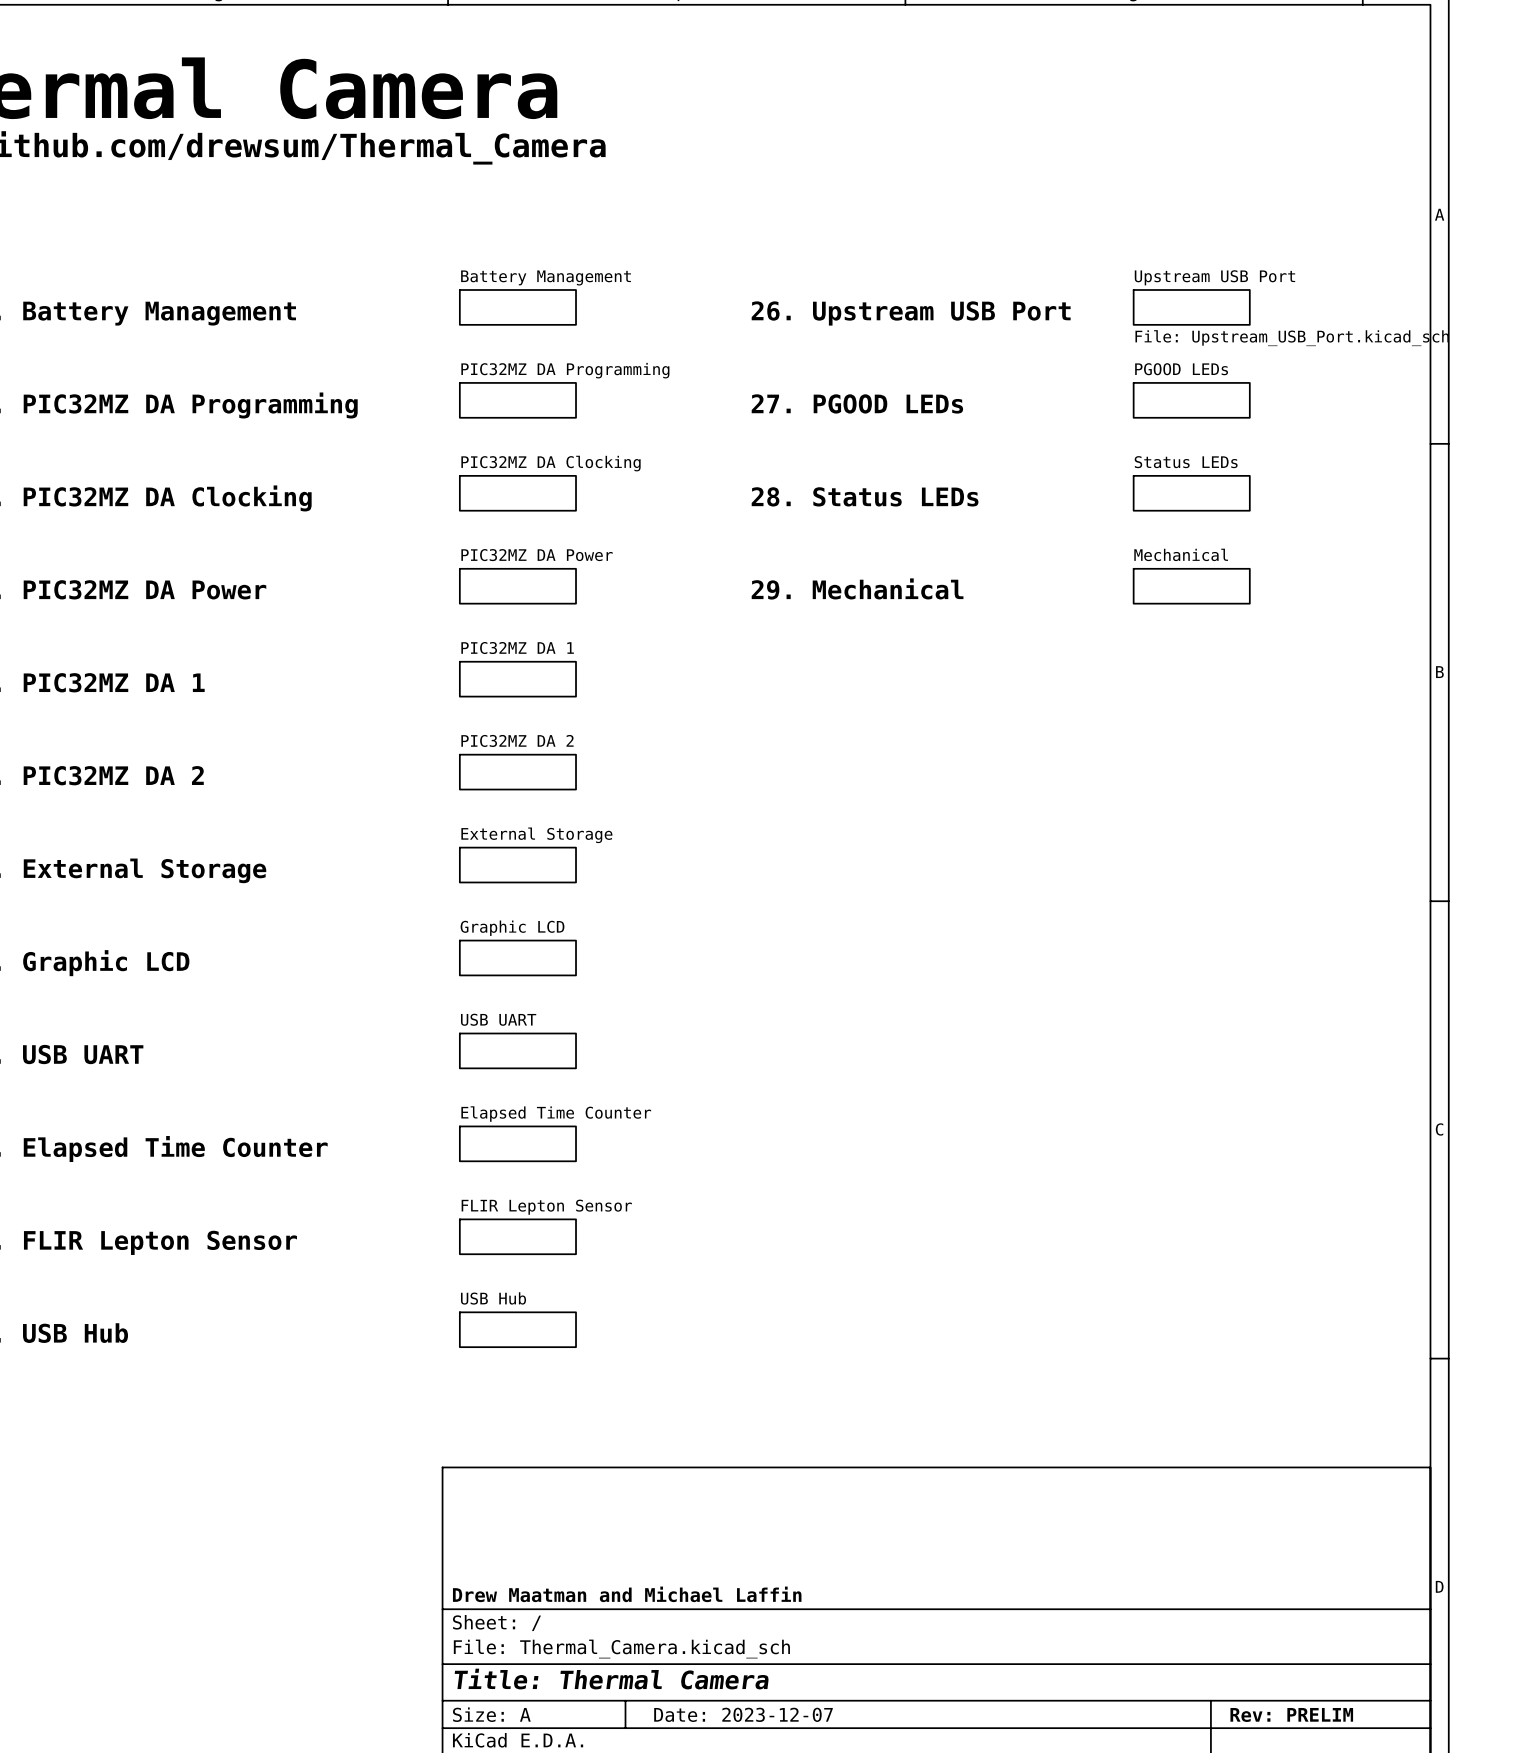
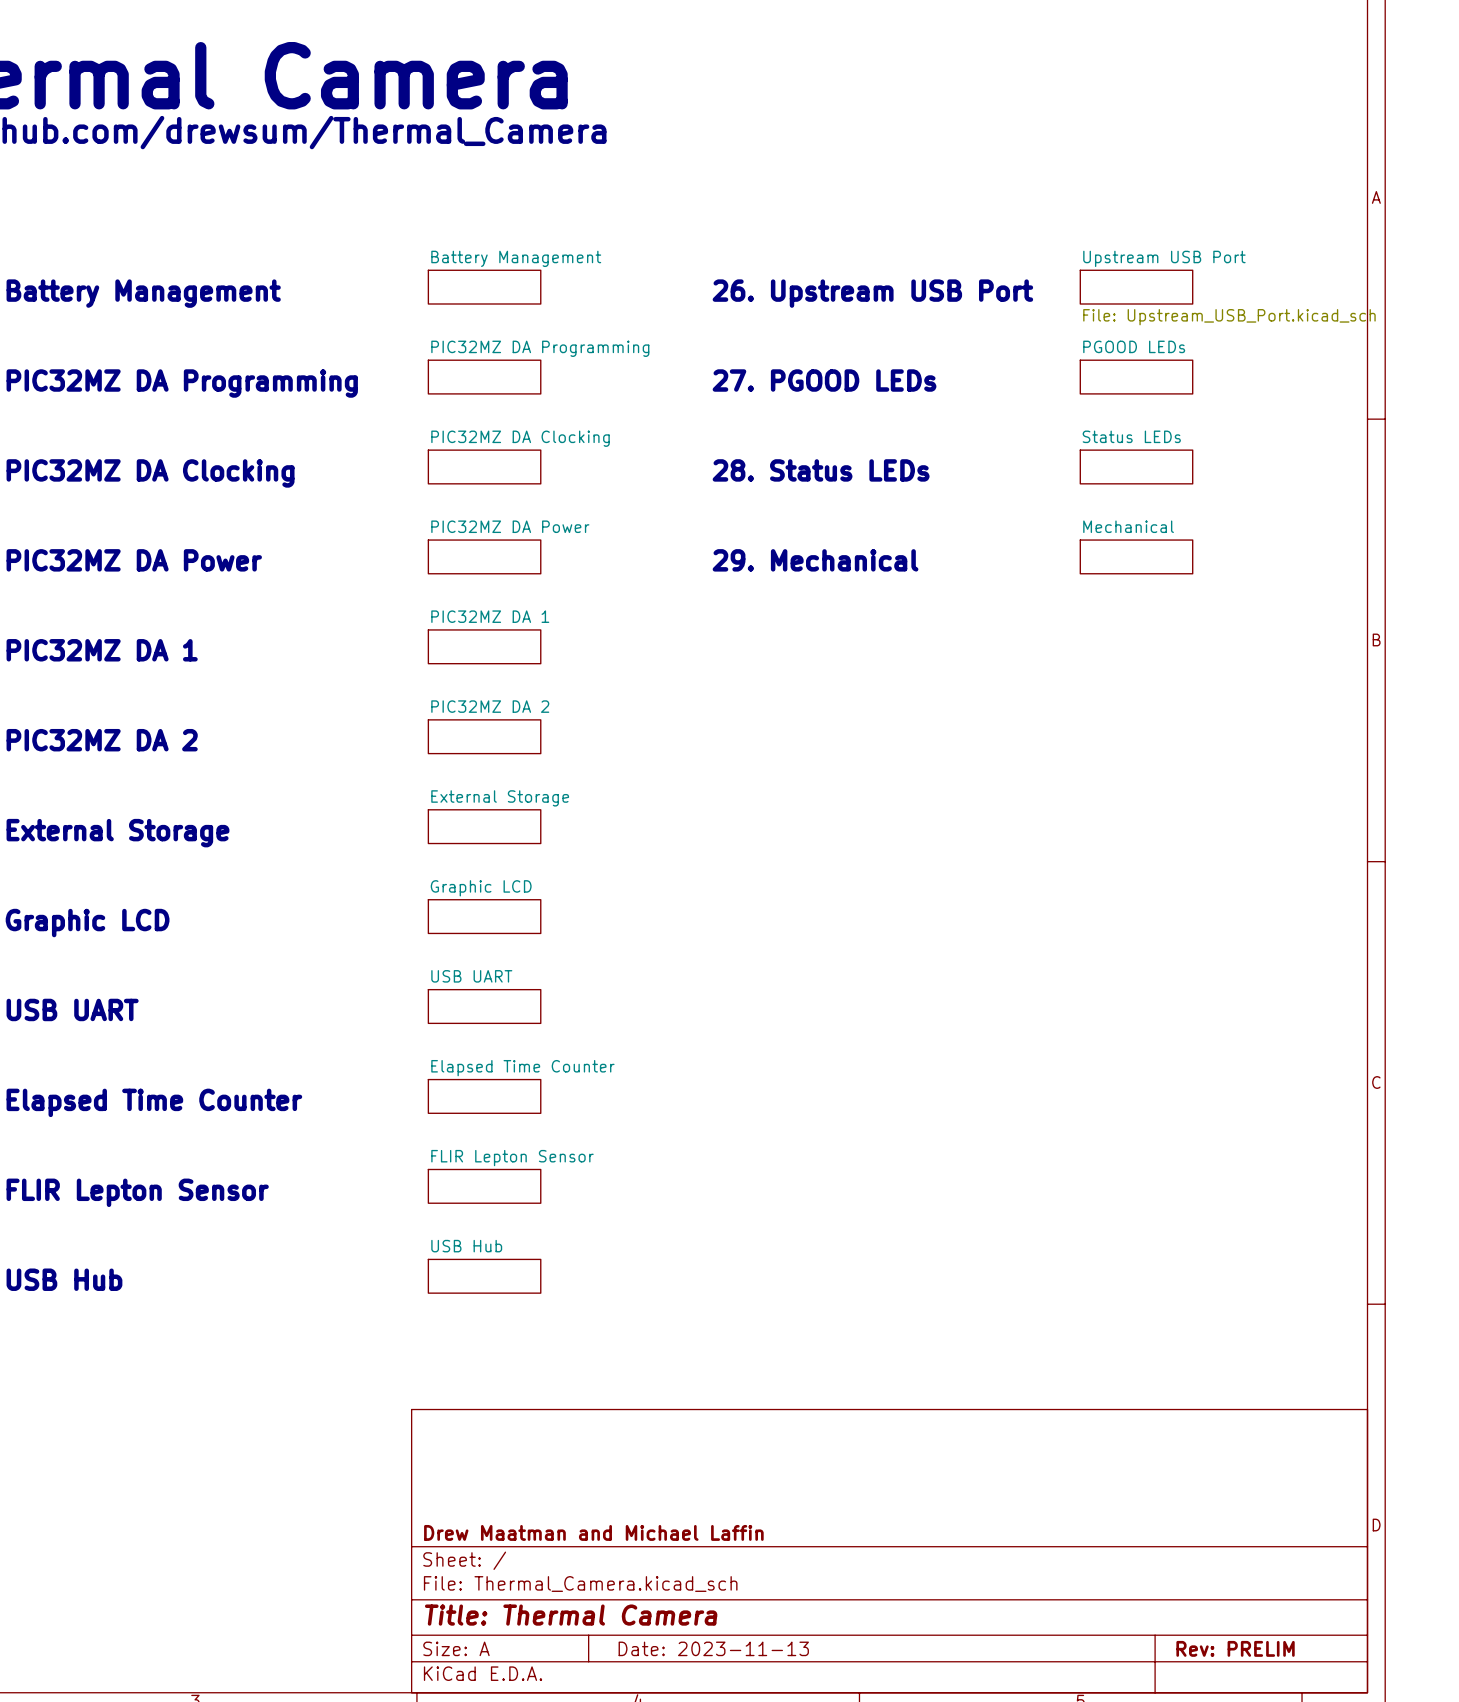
title block: Date: 2023-12-07 (743, 1714) -> Date: 2023-11-13 (713, 1648)

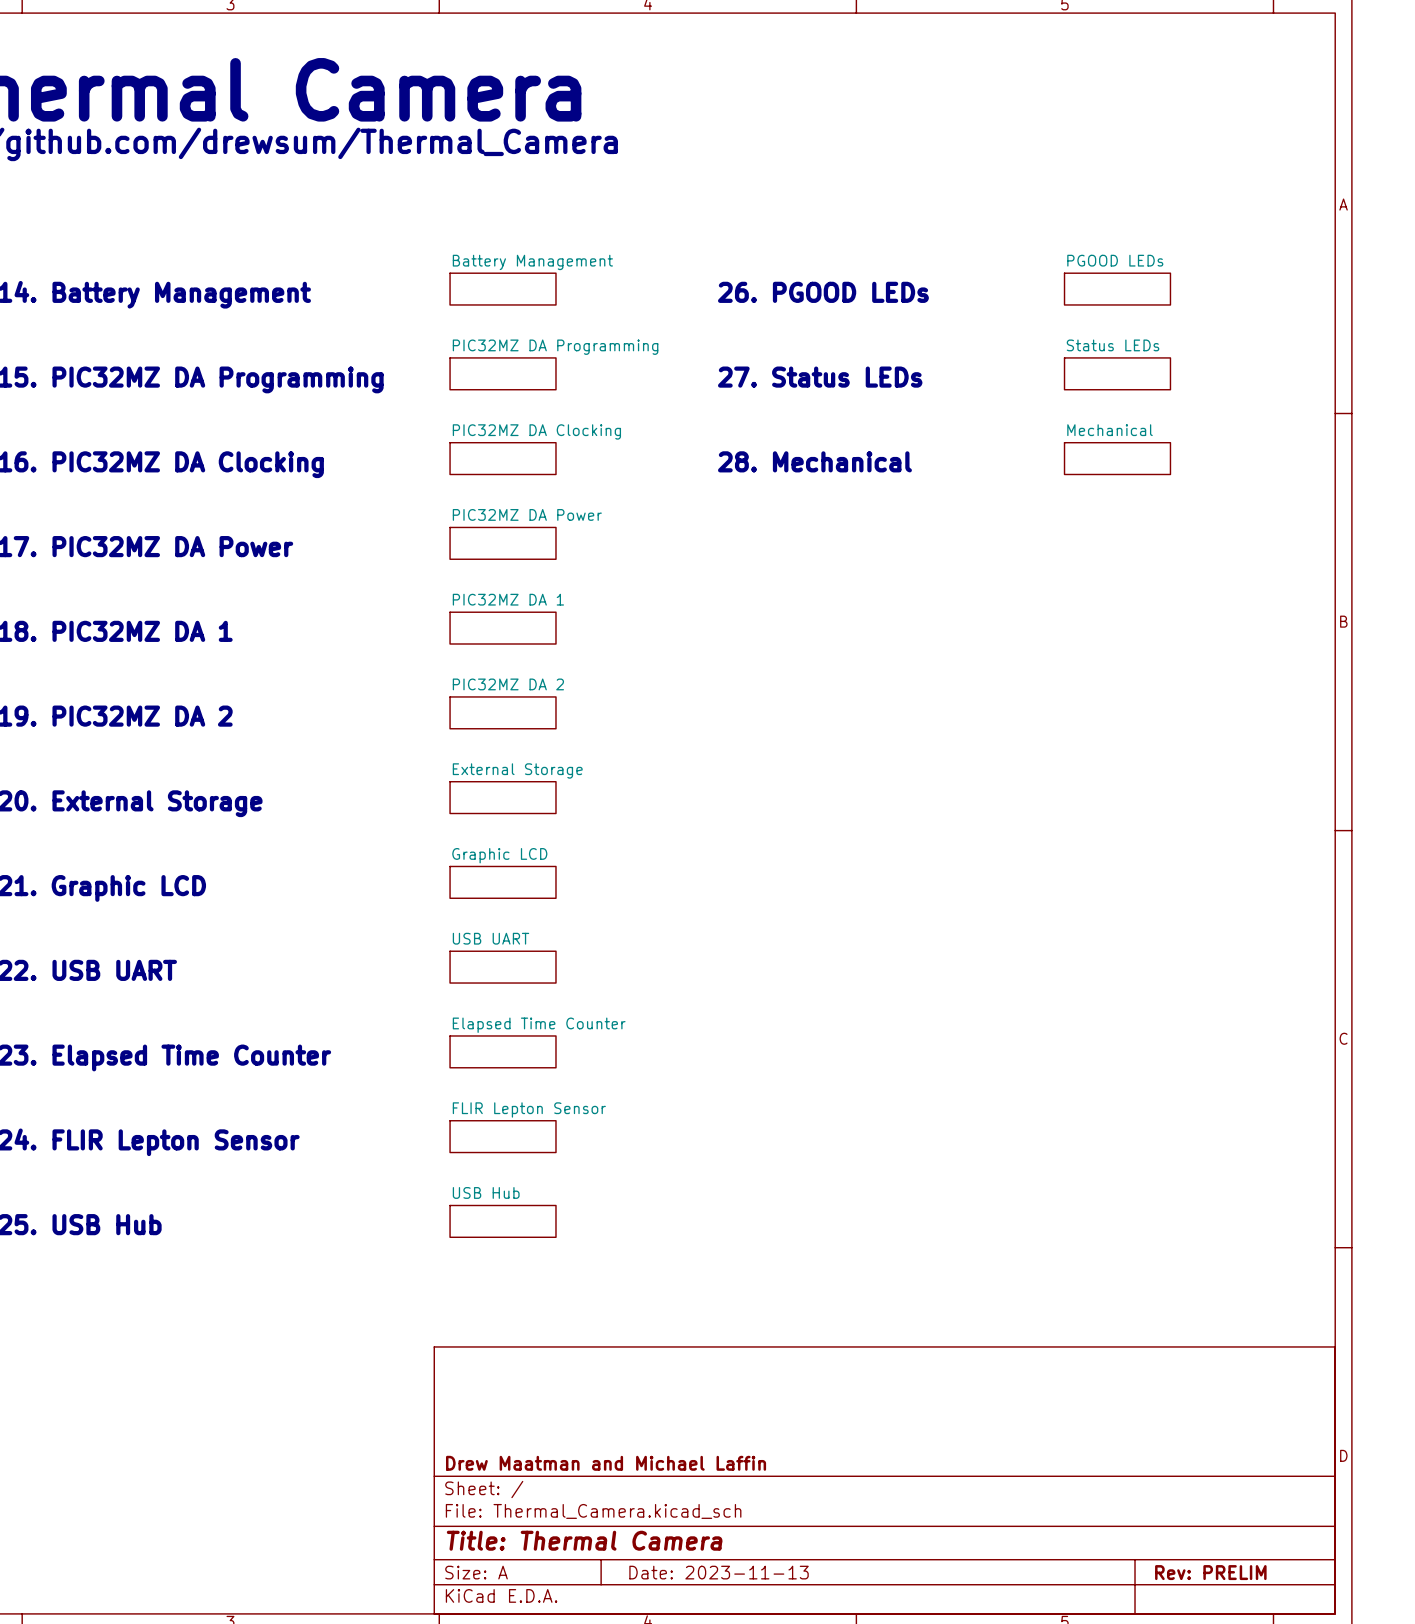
sheet Upstream USB Port name: Upstream USB Port (1164, 258) -> PGOOD LEDs (1115, 260)
text: 26. Upstream USB Port (872, 293) -> 26. PGOOD LEDs (823, 292)
sheet Upstream USB Port value: File: Upstream_USB_Port.kicad_sch (1229, 317) -> none
sheet PGOOD LEDs name: PGOOD LEDs (1134, 346) -> Status LEDs (1113, 345)
text: 27. PGOOD LEDs (824, 380) -> 27. Status LEDs (820, 377)
sheet Status LEDs name: Status LEDs (1131, 436) -> Mechanical (1110, 430)
text: 28. Status LEDs (821, 470) -> 28. Mechanical (814, 461)
sheet Mechanical: (1136, 556) -> none
text: 29. Mechanical (815, 560) -> none

